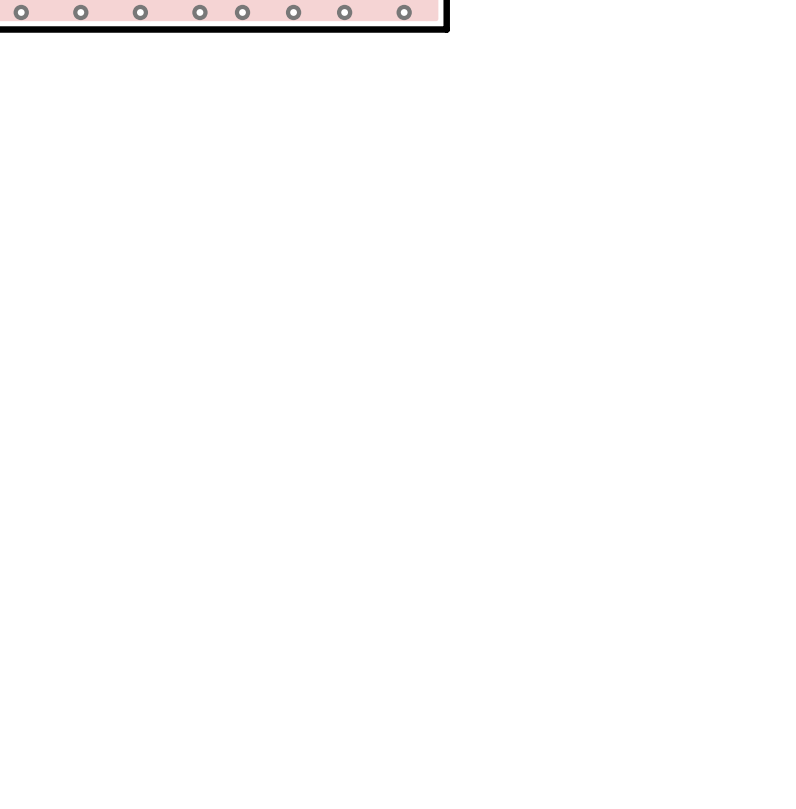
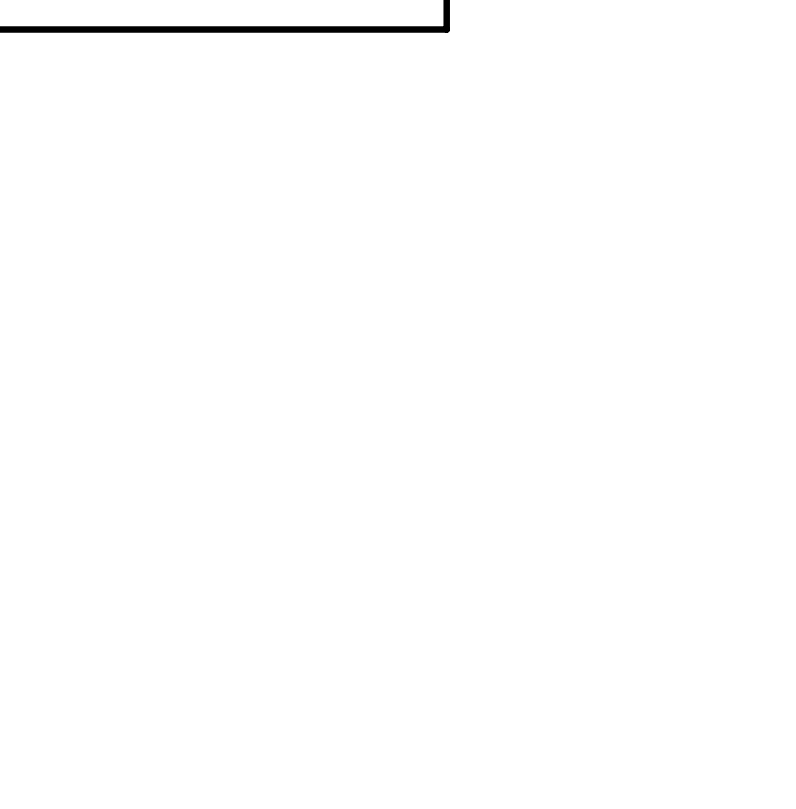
via: (21, 12) -> none
via: (80, 12) -> none
via: (140, 12) -> none
via: (199, 12) -> none
via: (242, 12) -> none
via: (293, 12) -> none
via: (344, 12) -> none
via: (404, 12) -> none

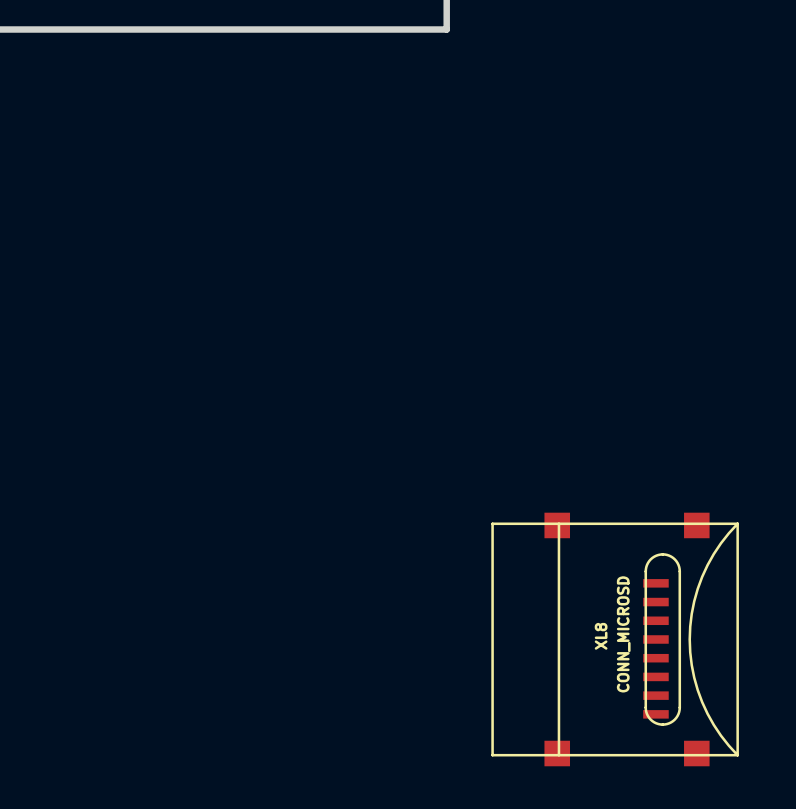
XL8: none -> CONN_MICROSD (615, 639)

